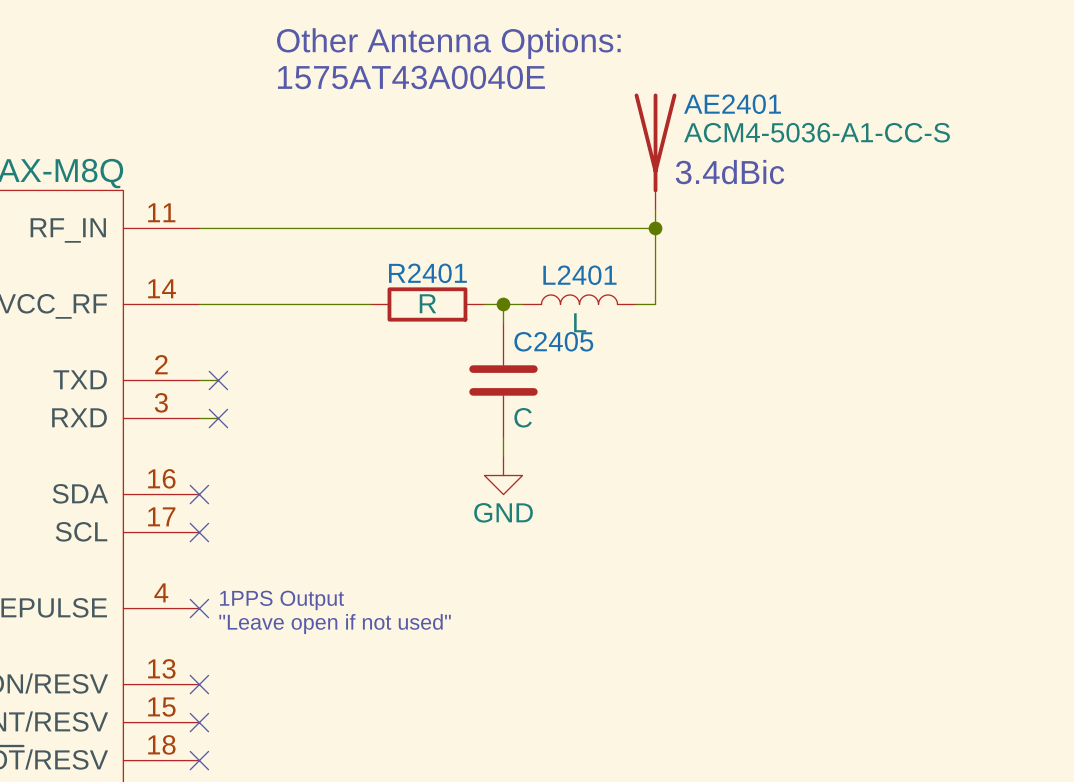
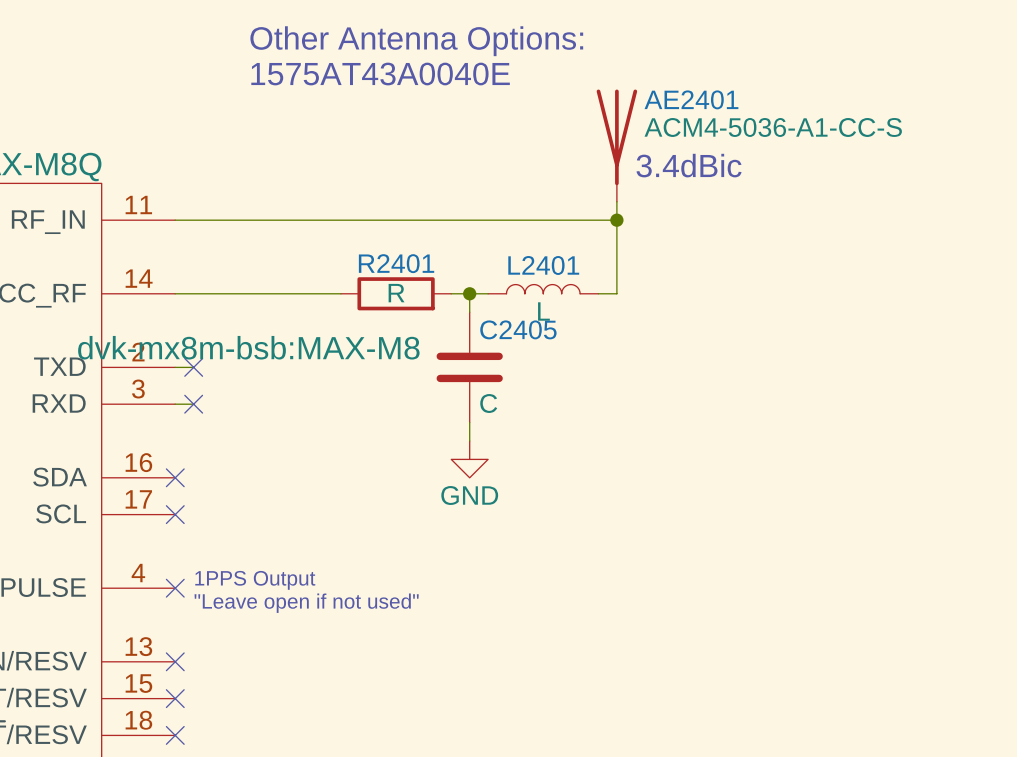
part text: none -> dvk-mx8m-bsb:MAX-M8 (248, 347)

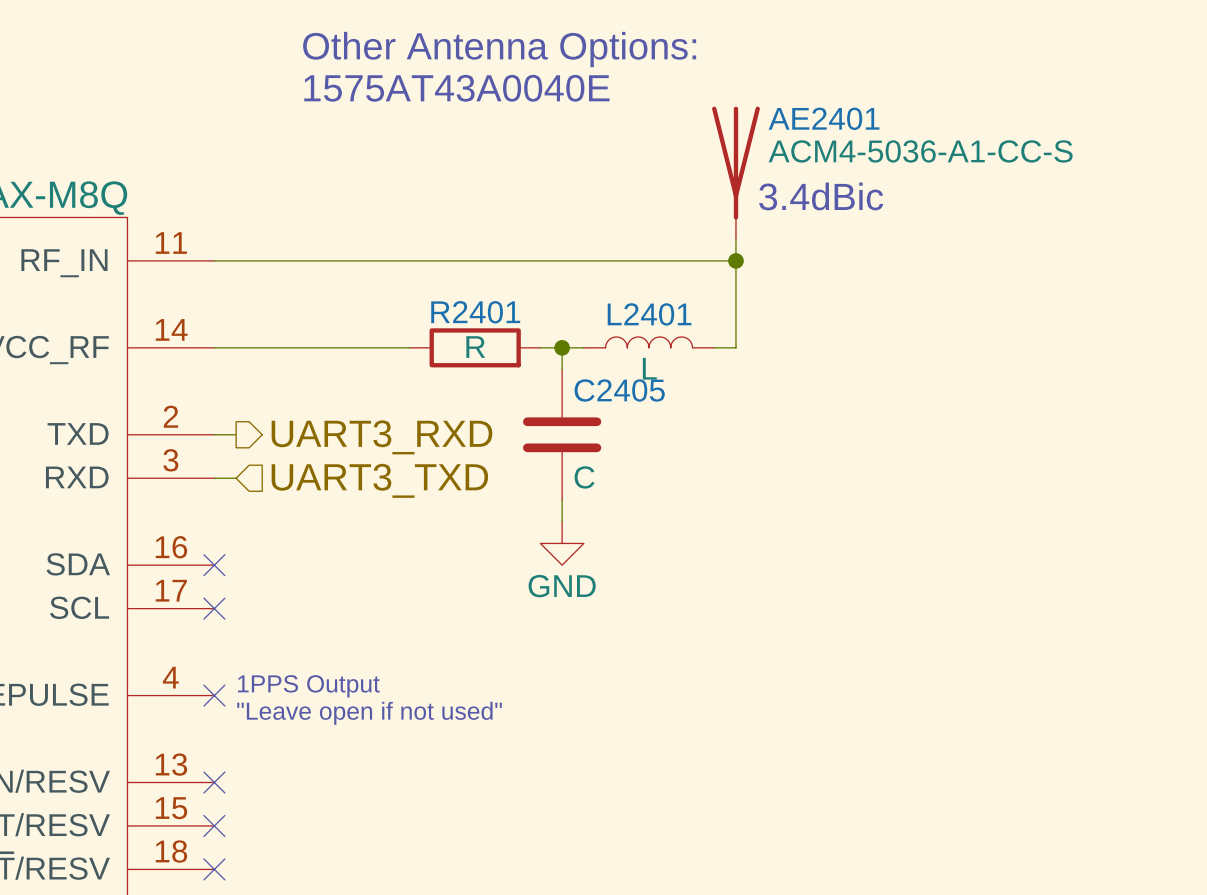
part text: dvk-mx8m-bsb:MAX-M8 (248, 347) -> none
no-connect mark: (193, 367) -> none
hierarchical label: none -> UART3_RXD (381, 437)
no-connect mark: (193, 404) -> none
hierarchical label: none -> UART3_TXD (379, 480)

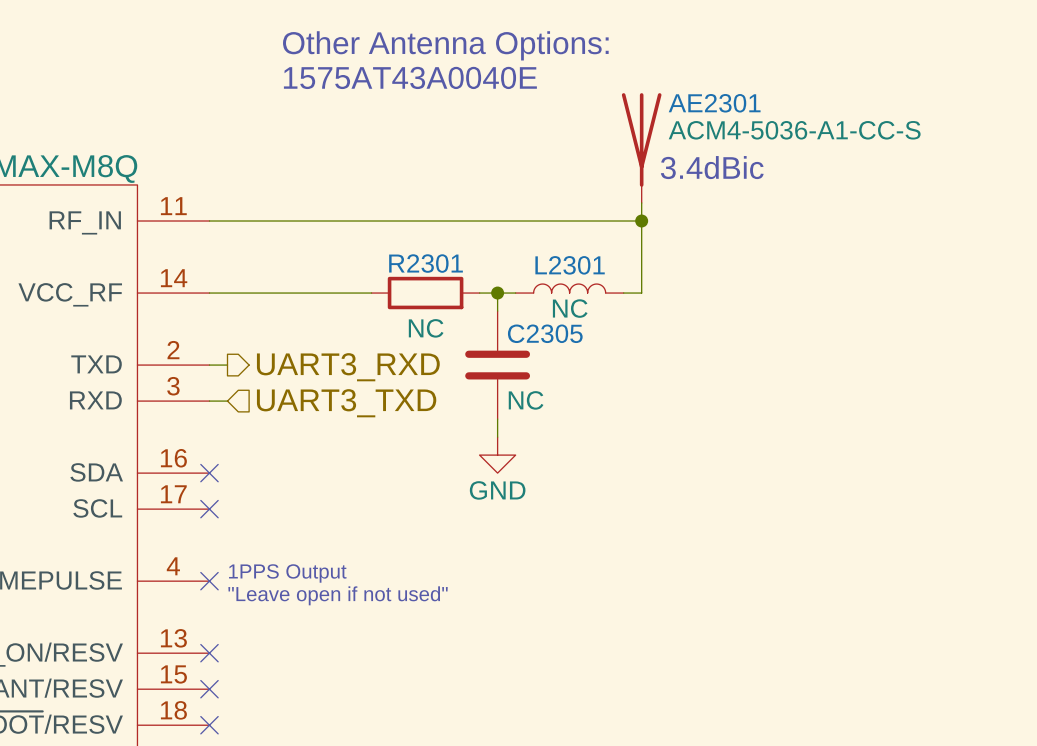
AE2401 name: AE2401 (824, 118) -> AE2301 (714, 103)
R2401 name: R2401 (475, 312) -> R2301 (426, 263)
L2401 name: L2401 (649, 314) -> L2301 (570, 265)
R2401 value: R (475, 347) -> NC (426, 328)
L2401 value: L (649, 368) -> NC (570, 308)
C2405 name: C2405 (619, 390) -> C2305 (545, 333)
C2405 value: C (584, 477) -> NC (526, 400)

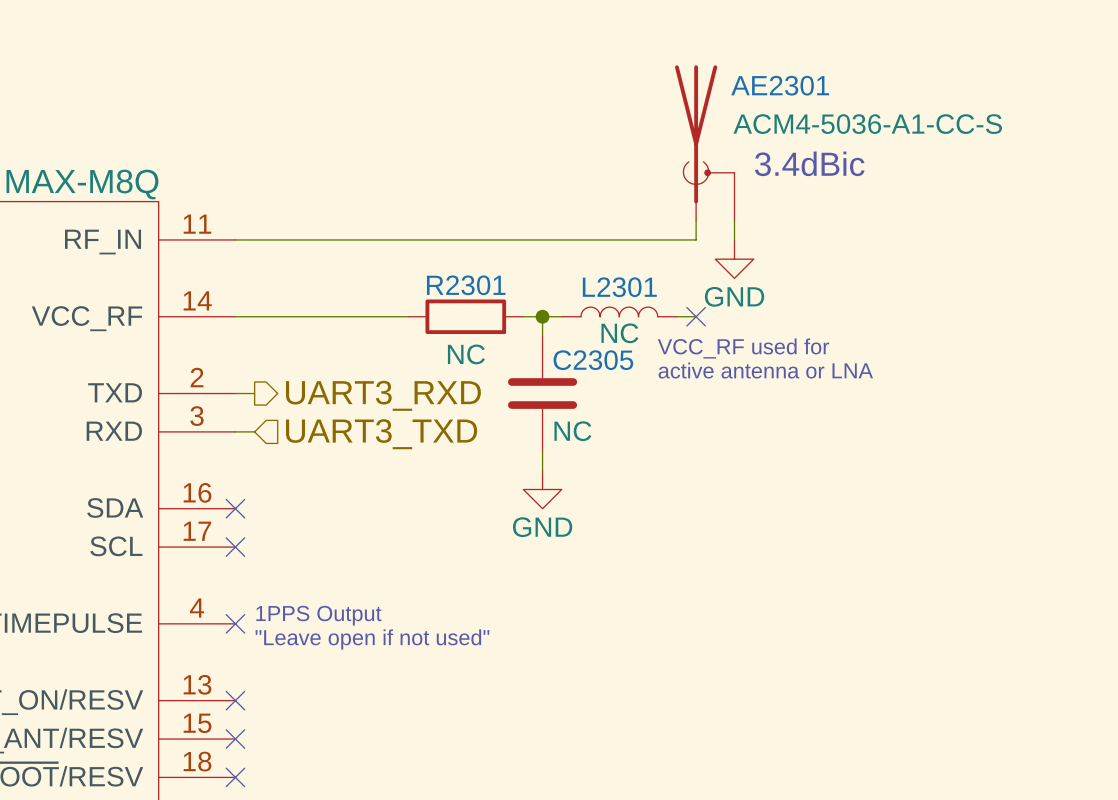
text: Other Antenna Options: (445, 45) -> none
text: 1575AT43A0040E (410, 77) -> none
AE2301 symbol: [621, 93, 662, 203] -> [675, 65, 735, 221]
AE2301 value: ACM4-5036-A1-CC-S (794, 130) -> ACM4‐5036‐A1‐CC‐S (867, 124)
text position: 3.4dBic (712, 167) -> 3.4dBic (809, 163)
wire: none -> (734, 220) (734, 239)
wire: (641, 221) (641, 293) -> none
junction: (641, 221) -> none
power symbol: none -> GND (734, 259)
no-connect mark: none -> (696, 316)
text: none -> VCC_RF used for (743, 348)
text: none -> active antenna or LNA (765, 370)

